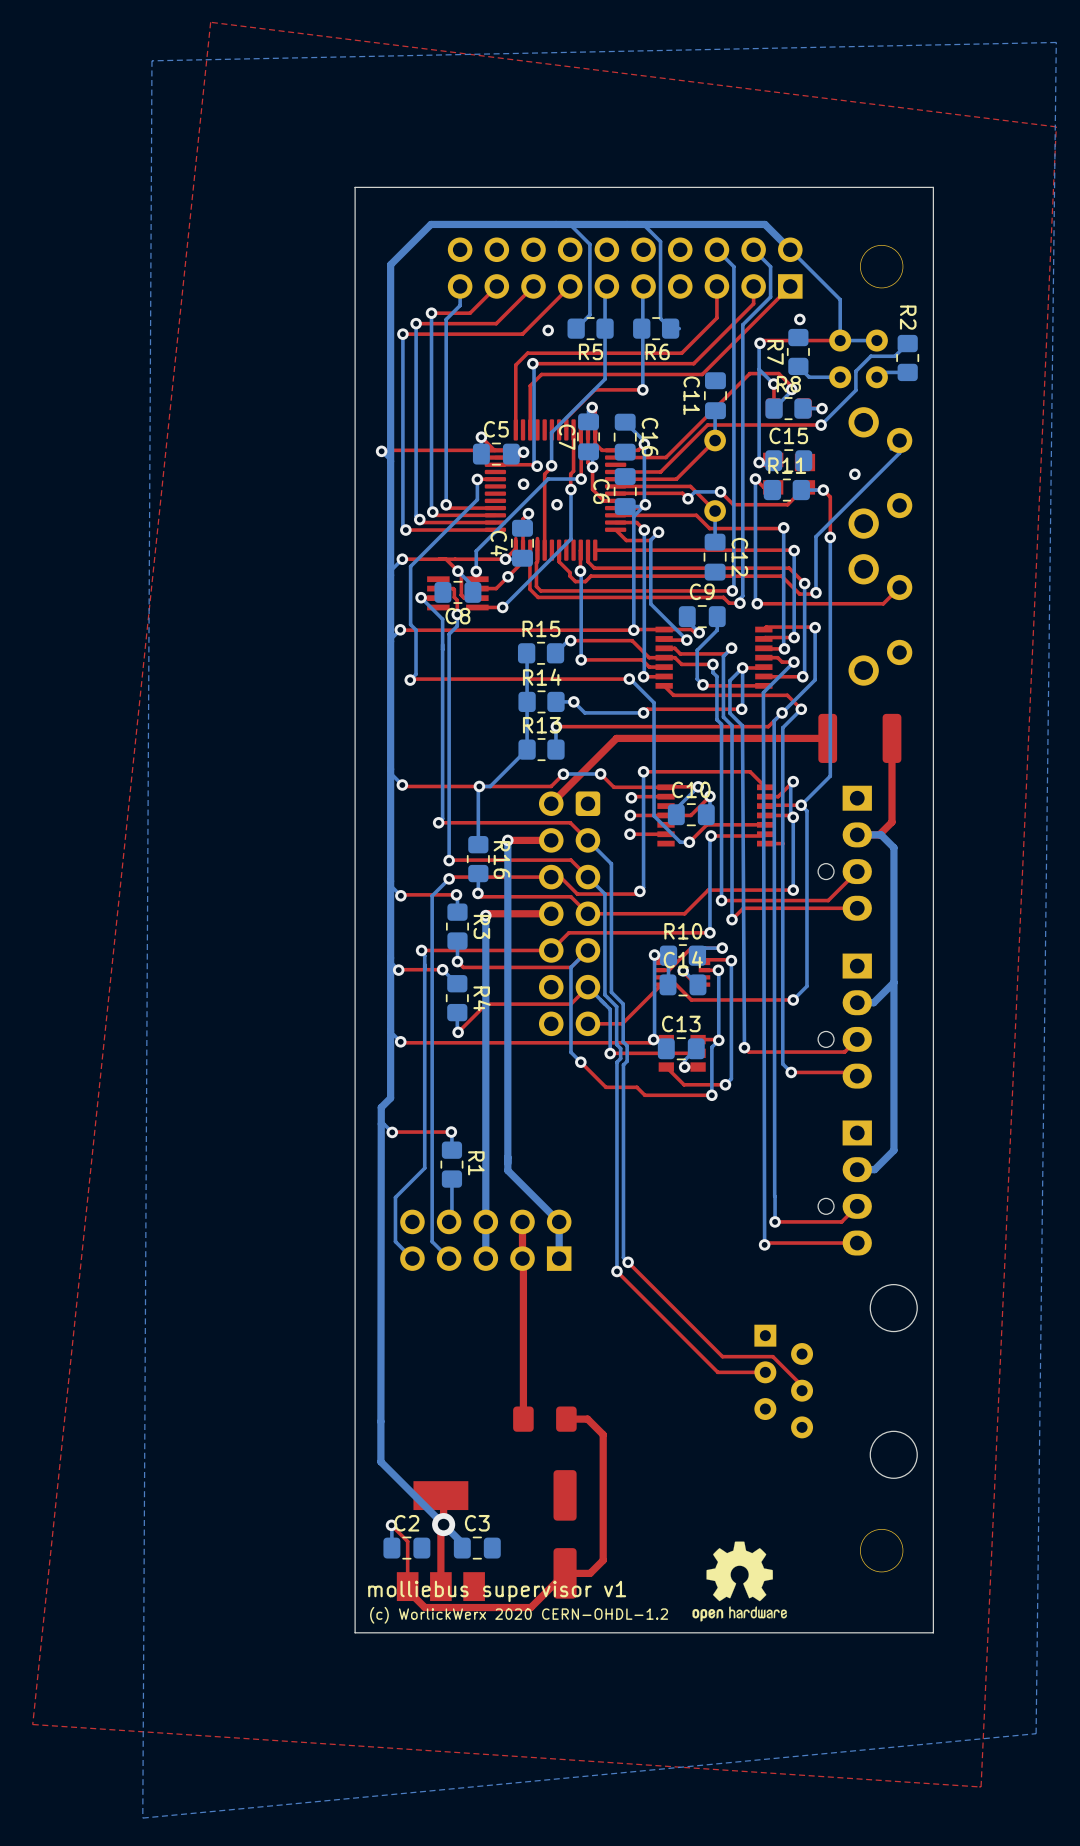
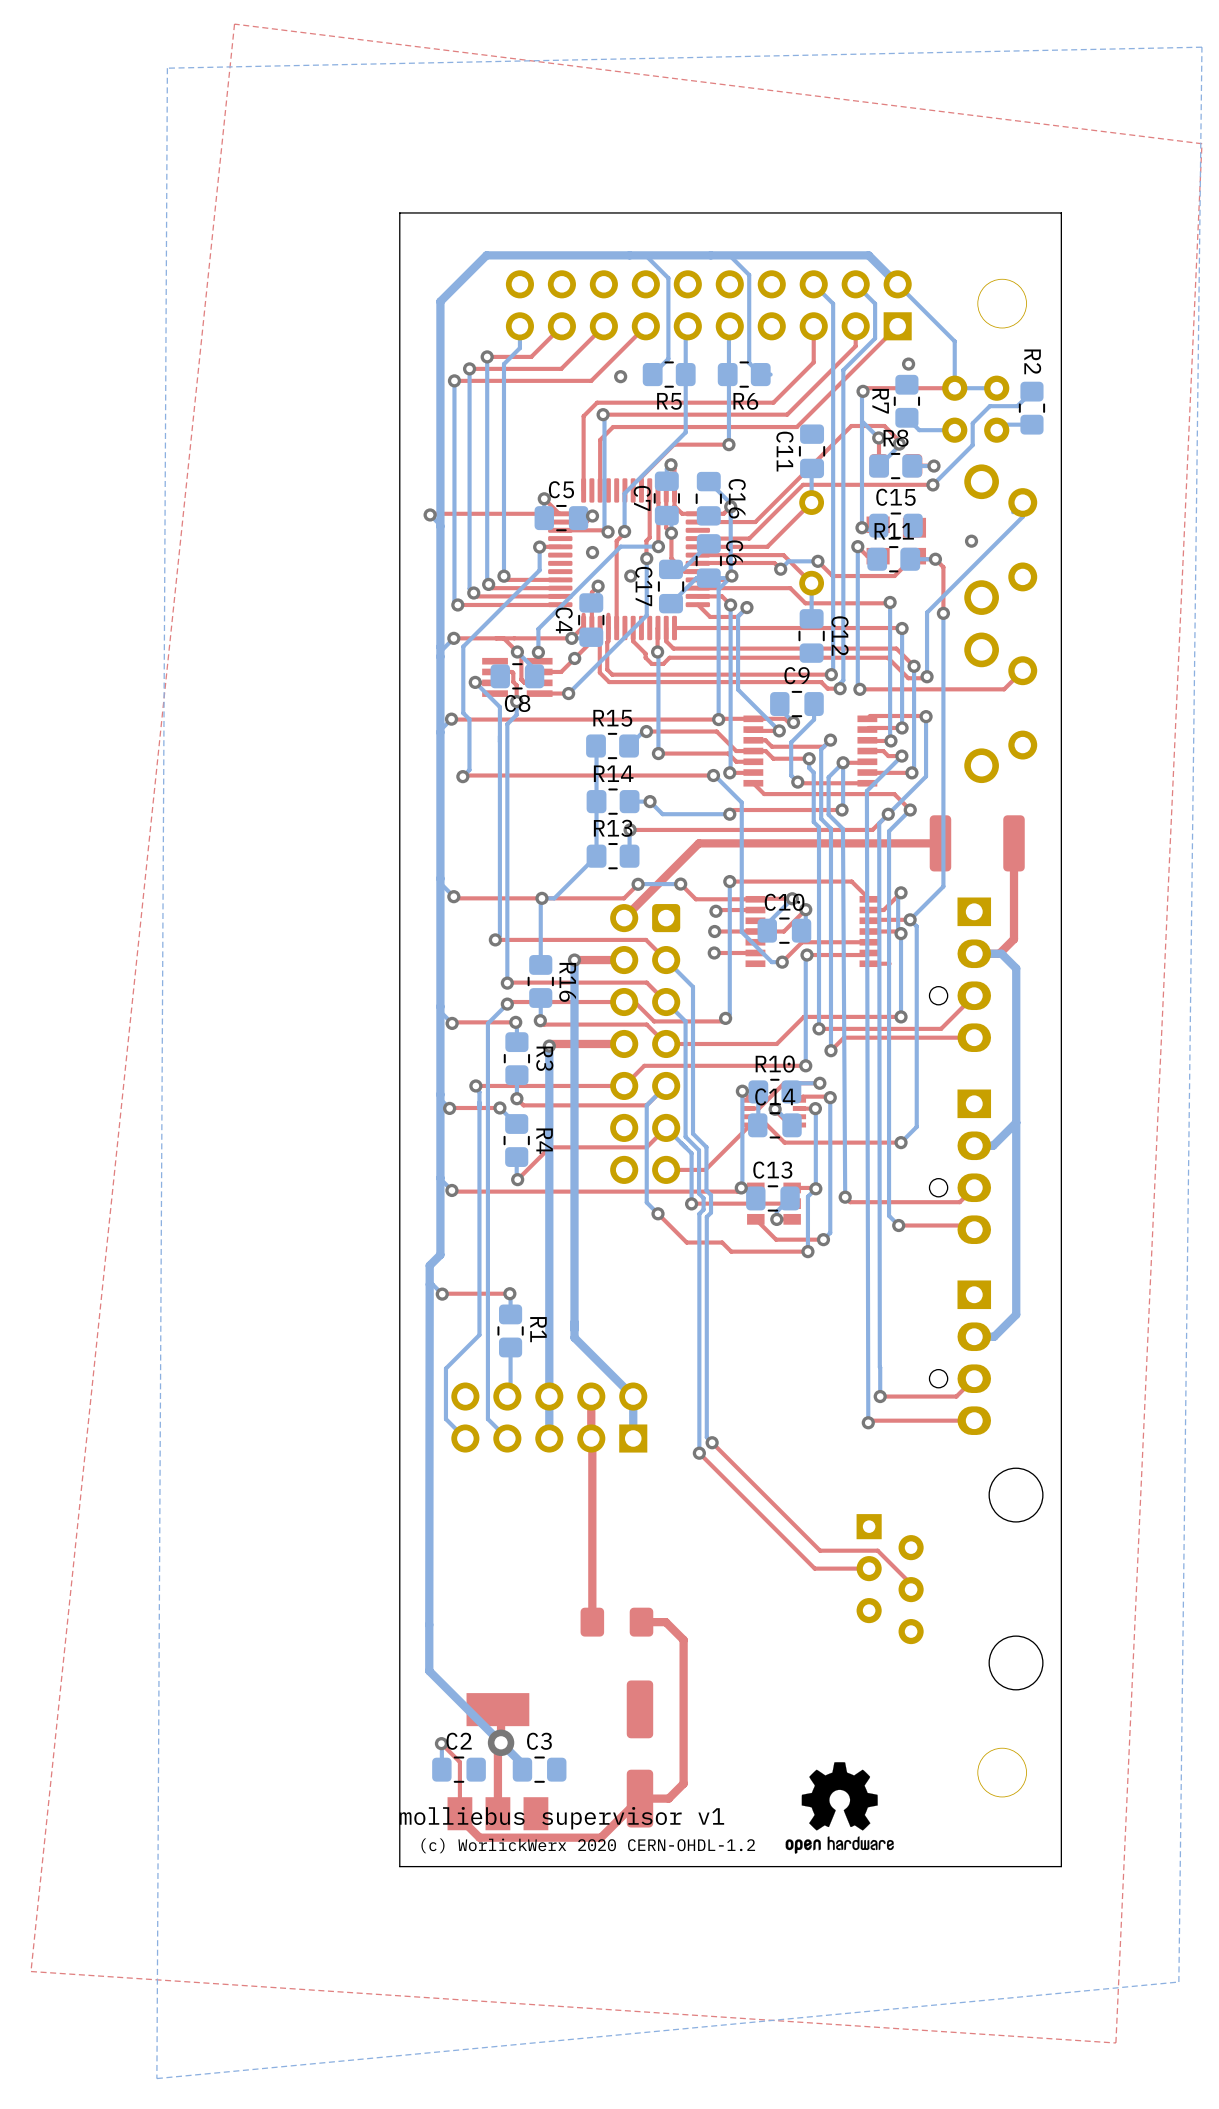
bottom track: none -> (708, 543) (683, 569) (671, 569)
C6 name position: C6 (601, 491) -> C6 (734, 553)
bottom track: none -> (708, 578) (696, 578) (671, 603)
C17: none -> (671, 586)

